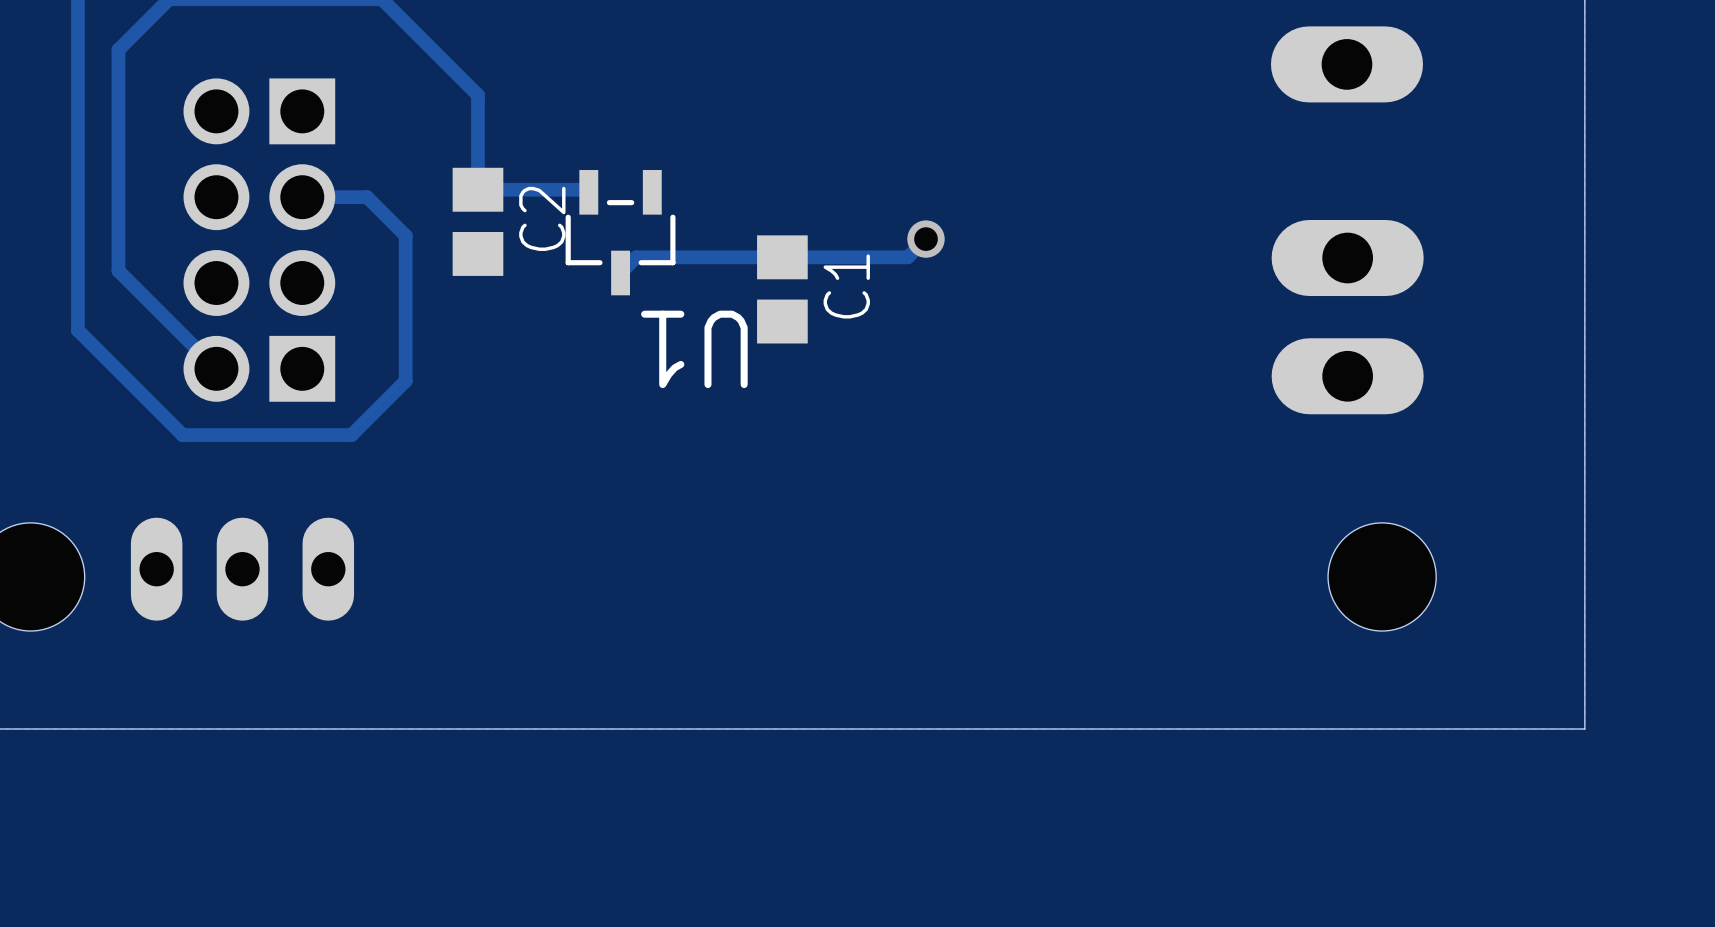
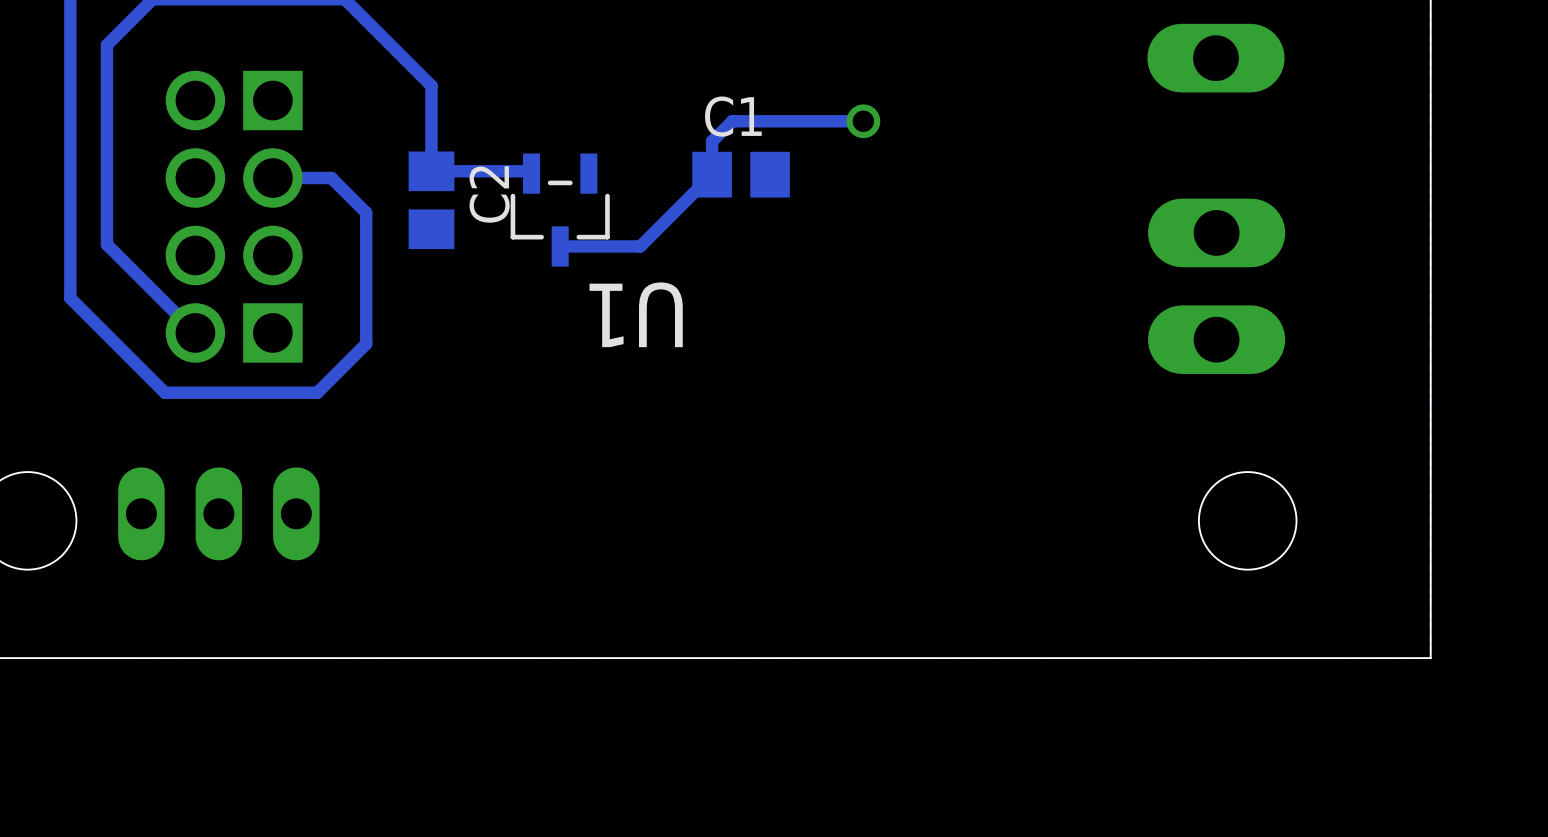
track: (925, 239) (907, 257) (636, 257) (620, 273) -> (863, 121) (732, 121) (712, 141) (712, 174) (640, 246) (560, 246)
via position: (925, 239) -> (863, 121)
C1 name position: C1 (846, 286) -> C1 (733, 116)
C1 rotation: 0° (782, 289) -> 90° clockwise (741, 174)
C1 position: (782, 289) -> (741, 174)

